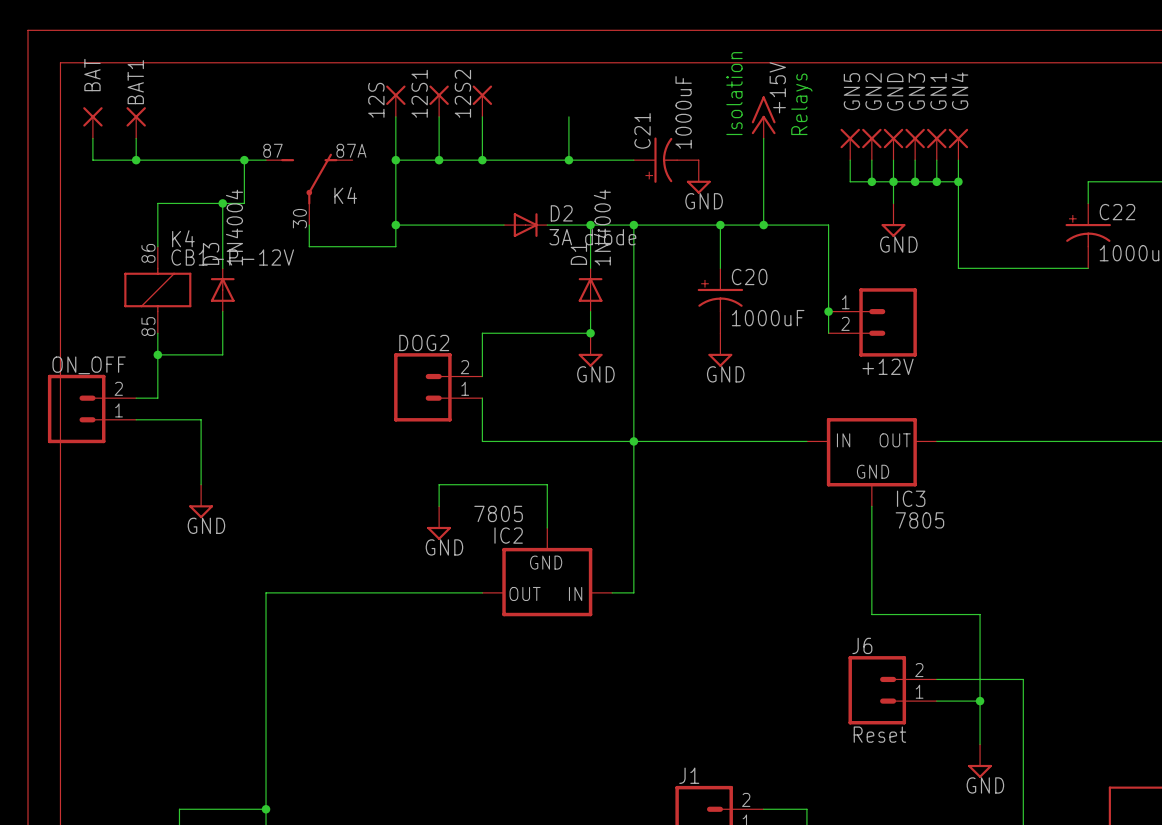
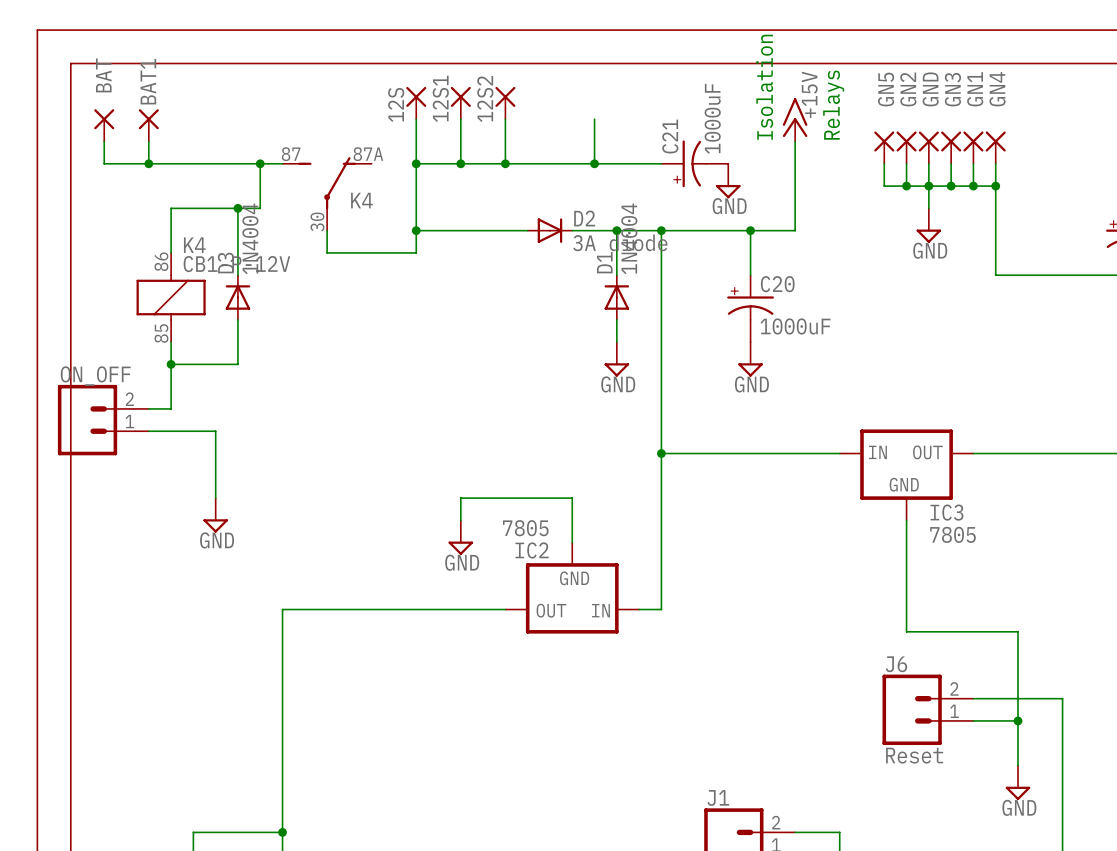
wire: (763, 225) (828, 225) (828, 333) -> none
junction: (763, 225) -> none
junction: (828, 311) -> none
+12V: (872, 322) -> none
wire: (590, 333) (482, 333) (482, 376) -> none
junction: (590, 333) -> none
DOG2: (438, 387) -> none
wire: (482, 398) (482, 441) (633, 441) -> none

